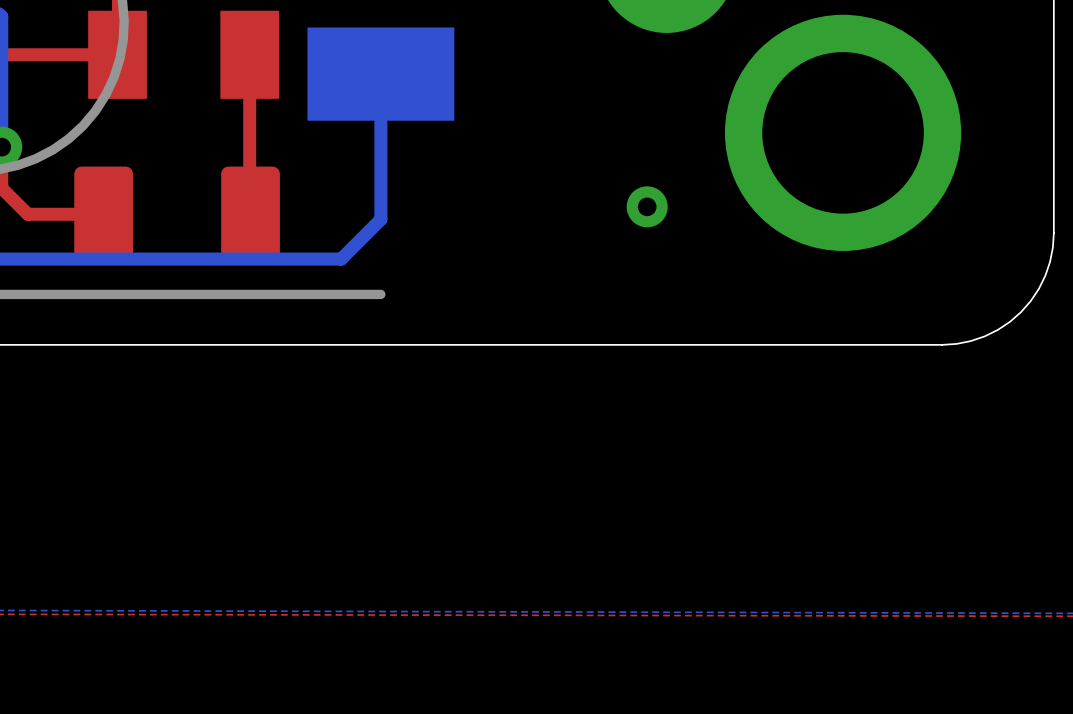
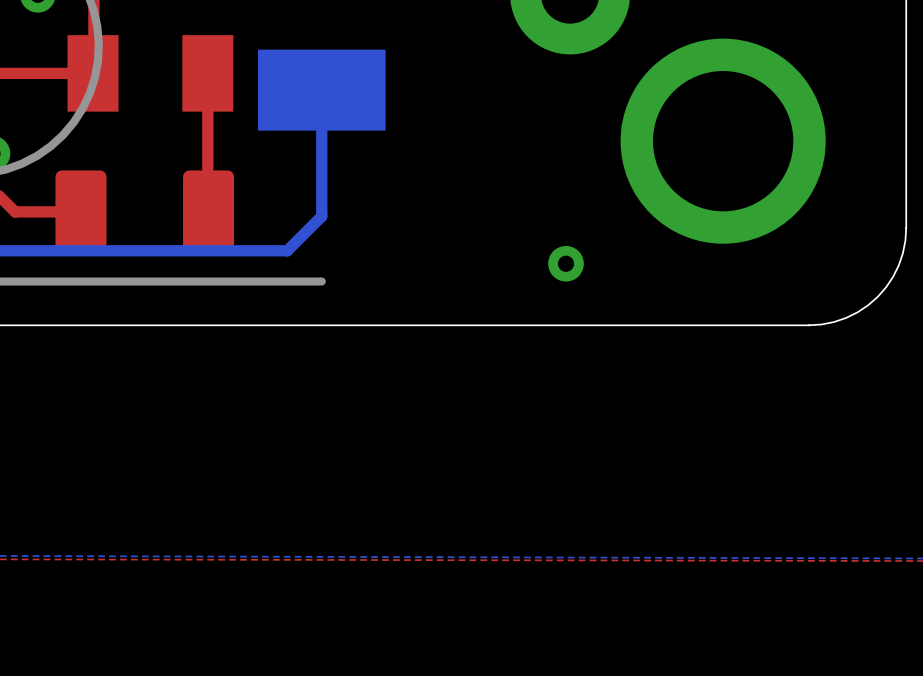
via position: (647, 206) -> (566, 263)

